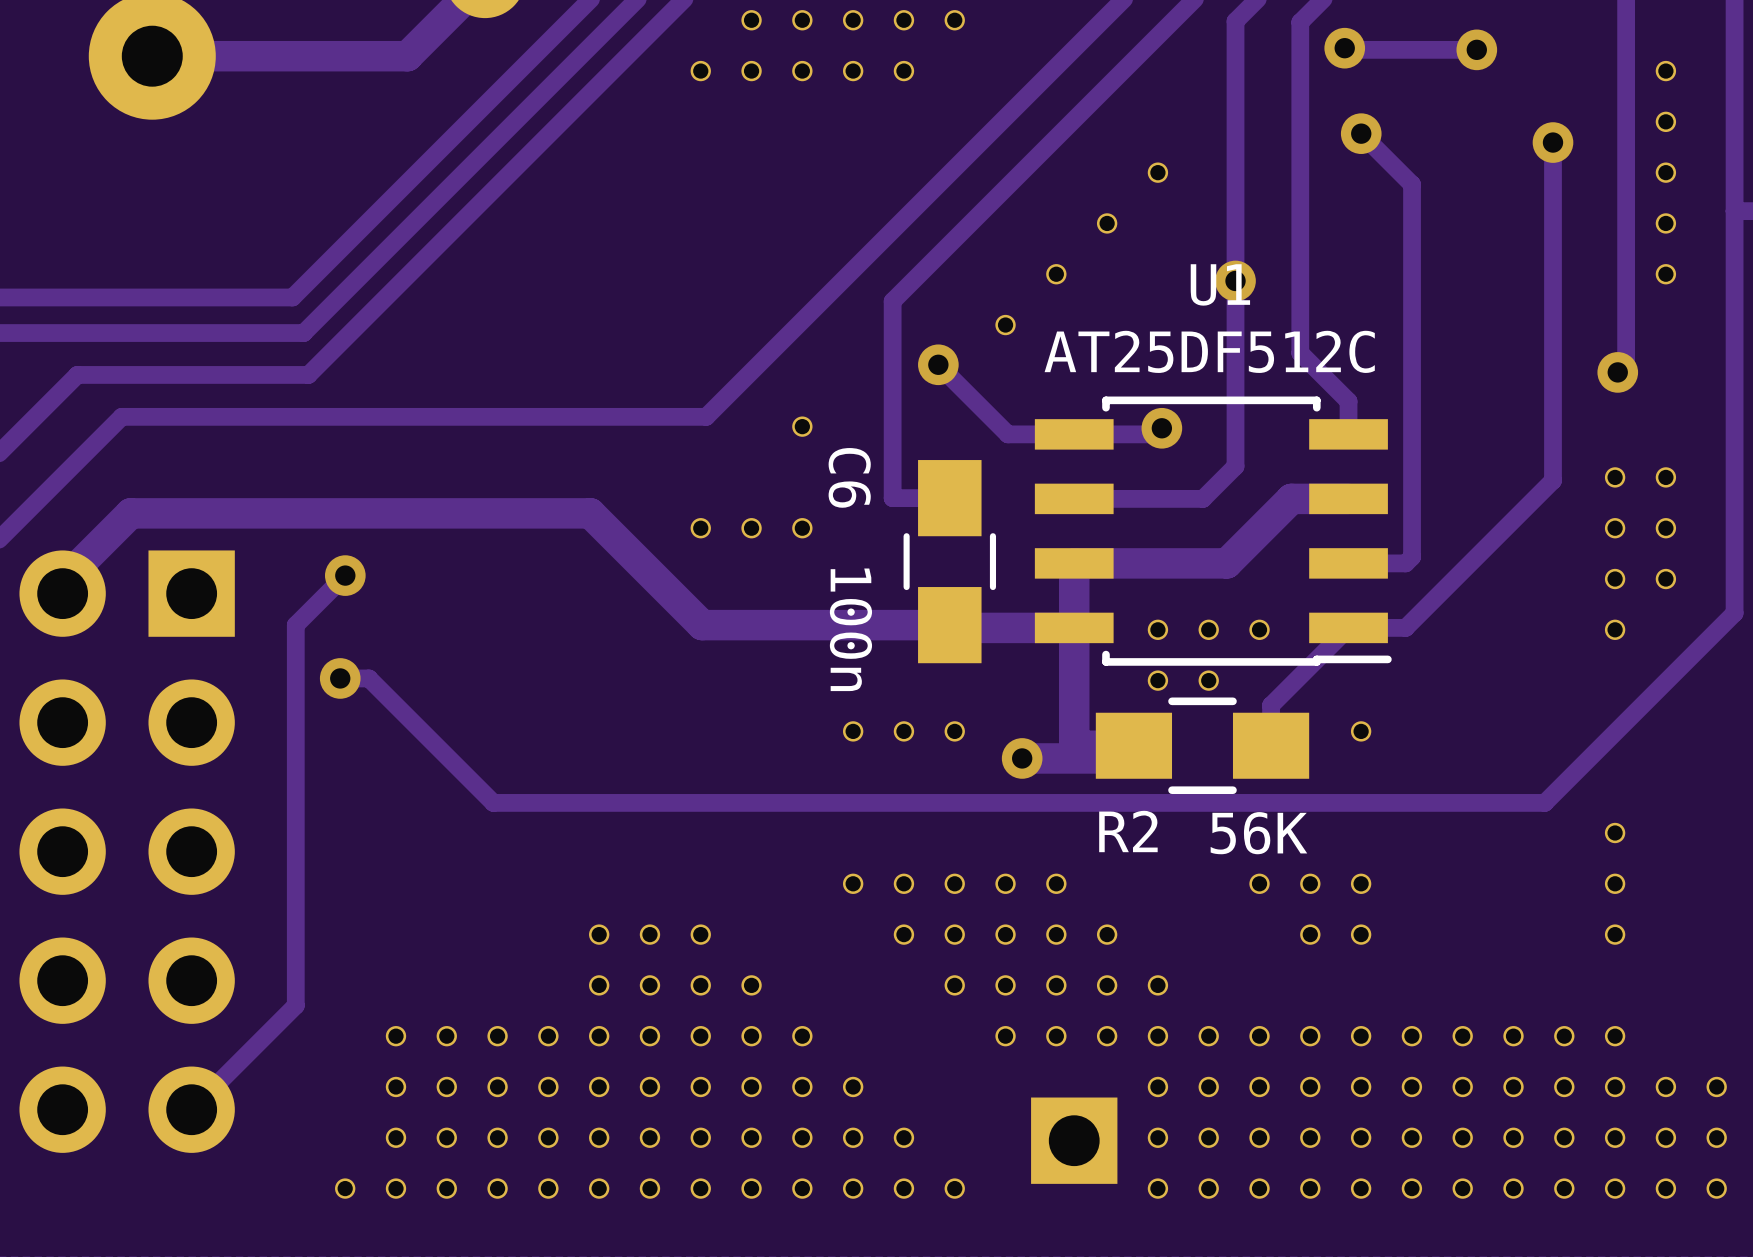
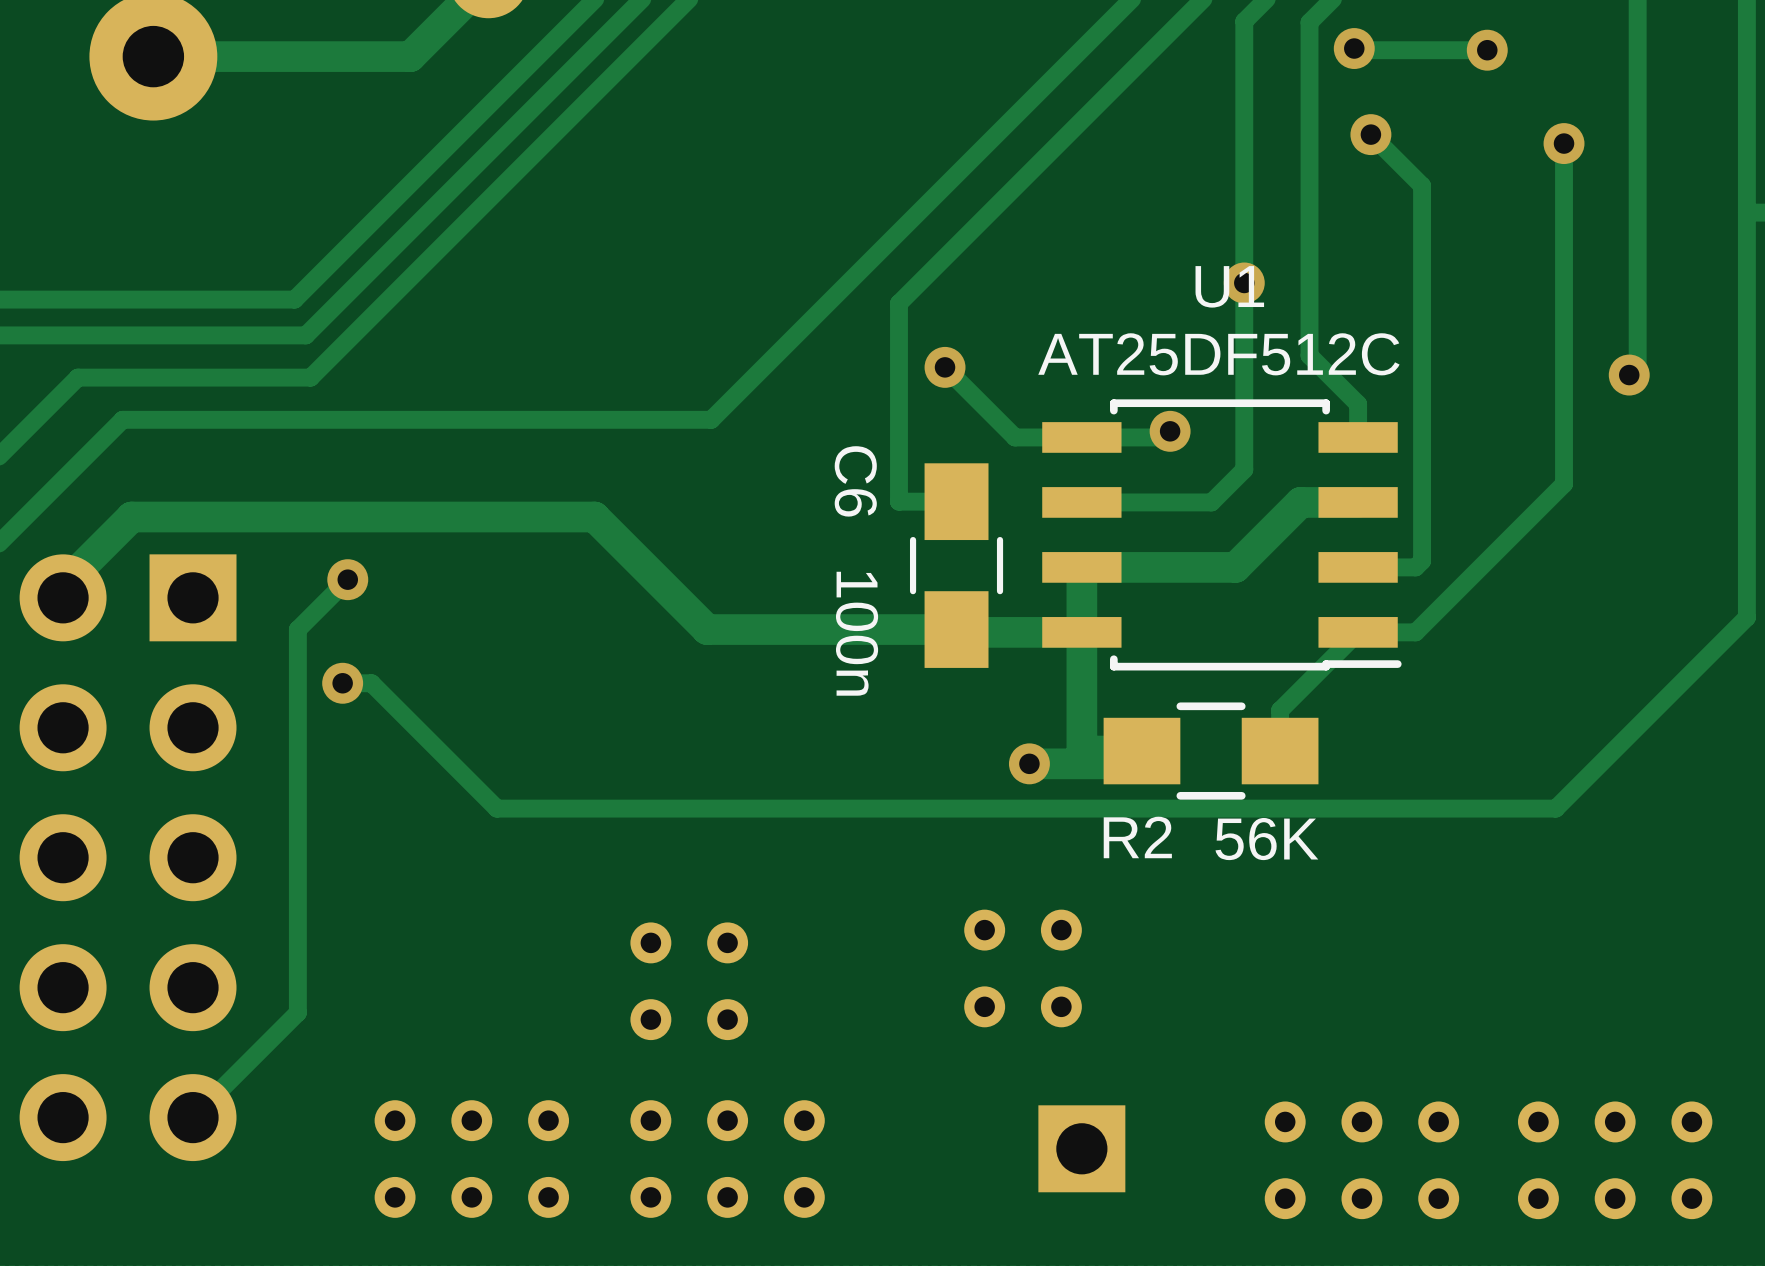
part: (751, 20) -> none
part: (802, 20) -> none
part: (853, 20) -> none
part: (903, 20) -> none
part: (954, 20) -> none
part: (700, 71) -> none
part: (751, 71) -> none
part: (802, 71) -> none
part: (853, 71) -> none
part: (903, 71) -> none
part: (1665, 71) -> none
part: (1665, 121) -> none
part: (1157, 172) -> none
part: (1665, 172) -> none
part: (1107, 223) -> none
part: (1665, 223) -> none
part: (1056, 274) -> none
part: (1665, 274) -> none
part: (1005, 325) -> none
part: (802, 426) -> none
part: (1615, 477) -> none
part: (1665, 477) -> none
part: (700, 528) -> none
part: (751, 528) -> none
part: (802, 528) -> none
part: (1615, 528) -> none
part: (1665, 528) -> none
part: (1615, 579) -> none
part: (1665, 579) -> none
part: (1157, 629) -> none
part: (1208, 629) -> none
part: (1259, 629) -> none
part: (1615, 629) -> none
part: (1157, 680) -> none
part: (1208, 680) -> none
part: (853, 731) -> none
part: (903, 731) -> none
part: (954, 731) -> none
part: (1361, 731) -> none
part: (1615, 833) -> none
part: (853, 883) -> none
part: (903, 883) -> none
part: (954, 883) -> none
part: (1005, 883) -> none
part: (1056, 883) -> none
part: (1259, 883) -> none
part: (1310, 883) -> none
part: (1361, 883) -> none
part: (1615, 883) -> none
part: none -> (984, 930)
part footprint: [639, 924, 661, 945] -> [630, 922, 672, 964]
part footprint: [690, 924, 711, 945] -> [707, 922, 749, 964]
part footprint: [1046, 924, 1067, 945] -> [1040, 909, 1082, 951]
part: (599, 934) -> none
part: (903, 934) -> none
part: (954, 934) -> none
part: (1005, 934) -> none
part: (1107, 934) -> none
part: (1310, 934) -> none
part: (1361, 934) -> none
part: (1615, 934) -> none
part footprint: [1046, 975, 1067, 996] -> [1040, 986, 1082, 1028]
part: (599, 985) -> none
part: (649, 985) -> none
part: (700, 985) -> none
part: (751, 985) -> none
part: (954, 985) -> none
part: (1005, 985) -> none
part: (1107, 985) -> none
part: (1157, 985) -> none
part: none -> (984, 1006)
part: none -> (650, 1019)
part: none -> (727, 1019)
part: (395, 1036) -> none
part: (446, 1036) -> none
part: (497, 1036) -> none
part: (548, 1036) -> none
part: (599, 1036) -> none
part: (649, 1036) -> none
part: (700, 1036) -> none
part: (751, 1036) -> none
part: (802, 1036) -> none
part: (1005, 1036) -> none
part: (1056, 1036) -> none
part: (1107, 1036) -> none
part: (1157, 1036) -> none
part: (1208, 1036) -> none
part: (1259, 1036) -> none
part: (1310, 1036) -> none
part: (1361, 1036) -> none
part: (1411, 1036) -> none
part: (1462, 1036) -> none
part: (1513, 1036) -> none
part: (1564, 1036) -> none
part: (1615, 1036) -> none
part: (395, 1086) -> none
part: (446, 1086) -> none
part: (497, 1086) -> none
part: (548, 1086) -> none
part: (599, 1086) -> none
part: (649, 1086) -> none
part: (700, 1086) -> none
part: (751, 1086) -> none
part: (802, 1086) -> none
part: (853, 1086) -> none
part: (1157, 1086) -> none
part: (1208, 1086) -> none
part: (1259, 1086) -> none
part: (1310, 1086) -> none
part: (1361, 1086) -> none
part: (1411, 1086) -> none
part: (1462, 1086) -> none
part: (1513, 1086) -> none
part: (1564, 1086) -> none
part: (1615, 1086) -> none
part: (1665, 1086) -> none
part: (1716, 1086) -> none
part: none -> (395, 1120)
part: none -> (471, 1120)
part: none -> (548, 1120)
part: none -> (650, 1120)
part: none -> (727, 1120)
part: none -> (804, 1120)
part: none -> (1285, 1121)
part: none -> (1361, 1121)
part: none -> (1438, 1121)
part: none -> (1538, 1121)
part: none -> (1615, 1121)
part: none -> (1691, 1121)
part: (395, 1137) -> none
part: (446, 1137) -> none
part: (497, 1137) -> none
part: (548, 1137) -> none
part: (599, 1137) -> none
part: (649, 1137) -> none
part: (700, 1137) -> none
part: (751, 1137) -> none
part: (802, 1137) -> none
part: (853, 1137) -> none
part: (903, 1137) -> none
part: (1157, 1137) -> none
part: (1208, 1137) -> none
part: (1259, 1137) -> none
part: (1310, 1137) -> none
part: (1361, 1137) -> none
part: (1411, 1137) -> none
part: (1462, 1137) -> none
part: (1513, 1137) -> none
part: (1564, 1137) -> none
part: (1615, 1137) -> none
part: (1665, 1137) -> none
part: (1716, 1137) -> none
part footprint: [385, 1178, 407, 1199] -> [374, 1176, 416, 1218]
part footprint: [538, 1178, 559, 1199] -> [528, 1176, 570, 1218]
part footprint: [639, 1178, 661, 1199] -> [630, 1176, 672, 1218]
part footprint: [792, 1178, 813, 1199] -> [783, 1176, 825, 1218]
part footprint: [1350, 1178, 1372, 1199] -> [1341, 1178, 1383, 1220]
part footprint: [1503, 1178, 1524, 1199] -> [1517, 1178, 1559, 1220]
part footprint: [1604, 1178, 1626, 1199] -> [1594, 1178, 1636, 1220]
part footprint: [1655, 1178, 1677, 1199] -> [1671, 1178, 1713, 1220]
part: (345, 1188) -> none
part: (446, 1188) -> none
part: none -> (471, 1197)
part: (497, 1188) -> none
part: (599, 1188) -> none
part: (700, 1188) -> none
part: none -> (727, 1197)
part: (751, 1188) -> none
part: (853, 1188) -> none
part: (903, 1188) -> none
part: (954, 1188) -> none
part: (1157, 1188) -> none
part: (1208, 1188) -> none
part: (1259, 1188) -> none
part: (1310, 1188) -> none
part: (1411, 1188) -> none
part: (1462, 1188) -> none
part: (1564, 1188) -> none
part: (1716, 1188) -> none
part: none -> (1285, 1198)
part: none -> (1438, 1198)

